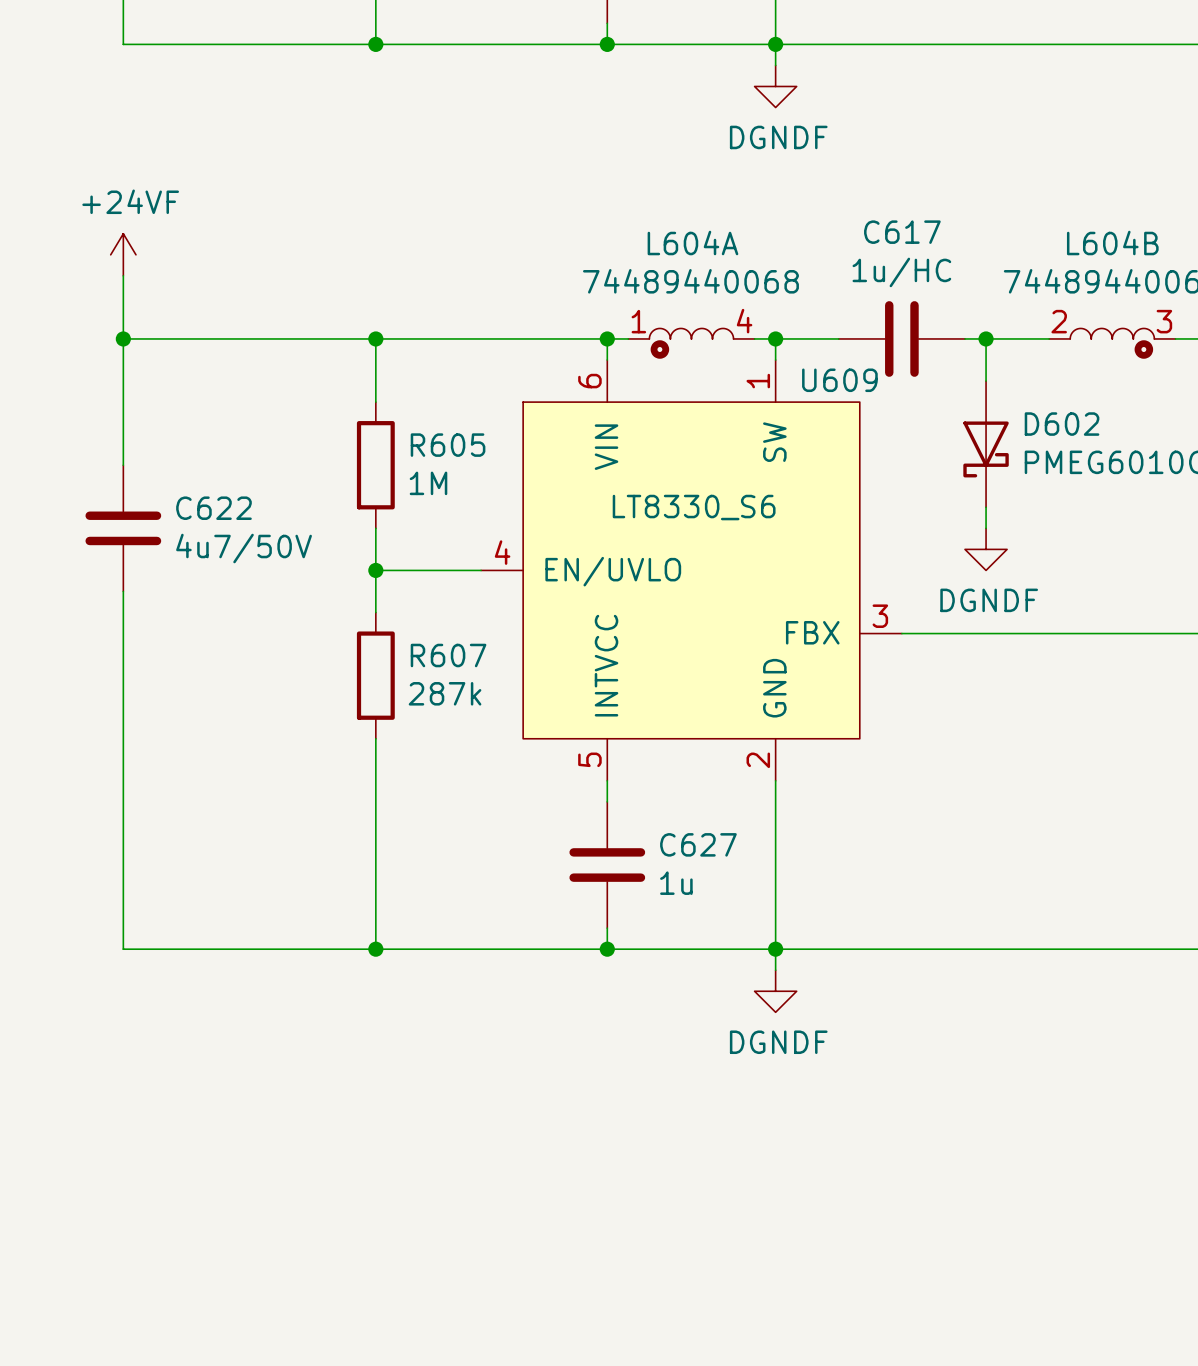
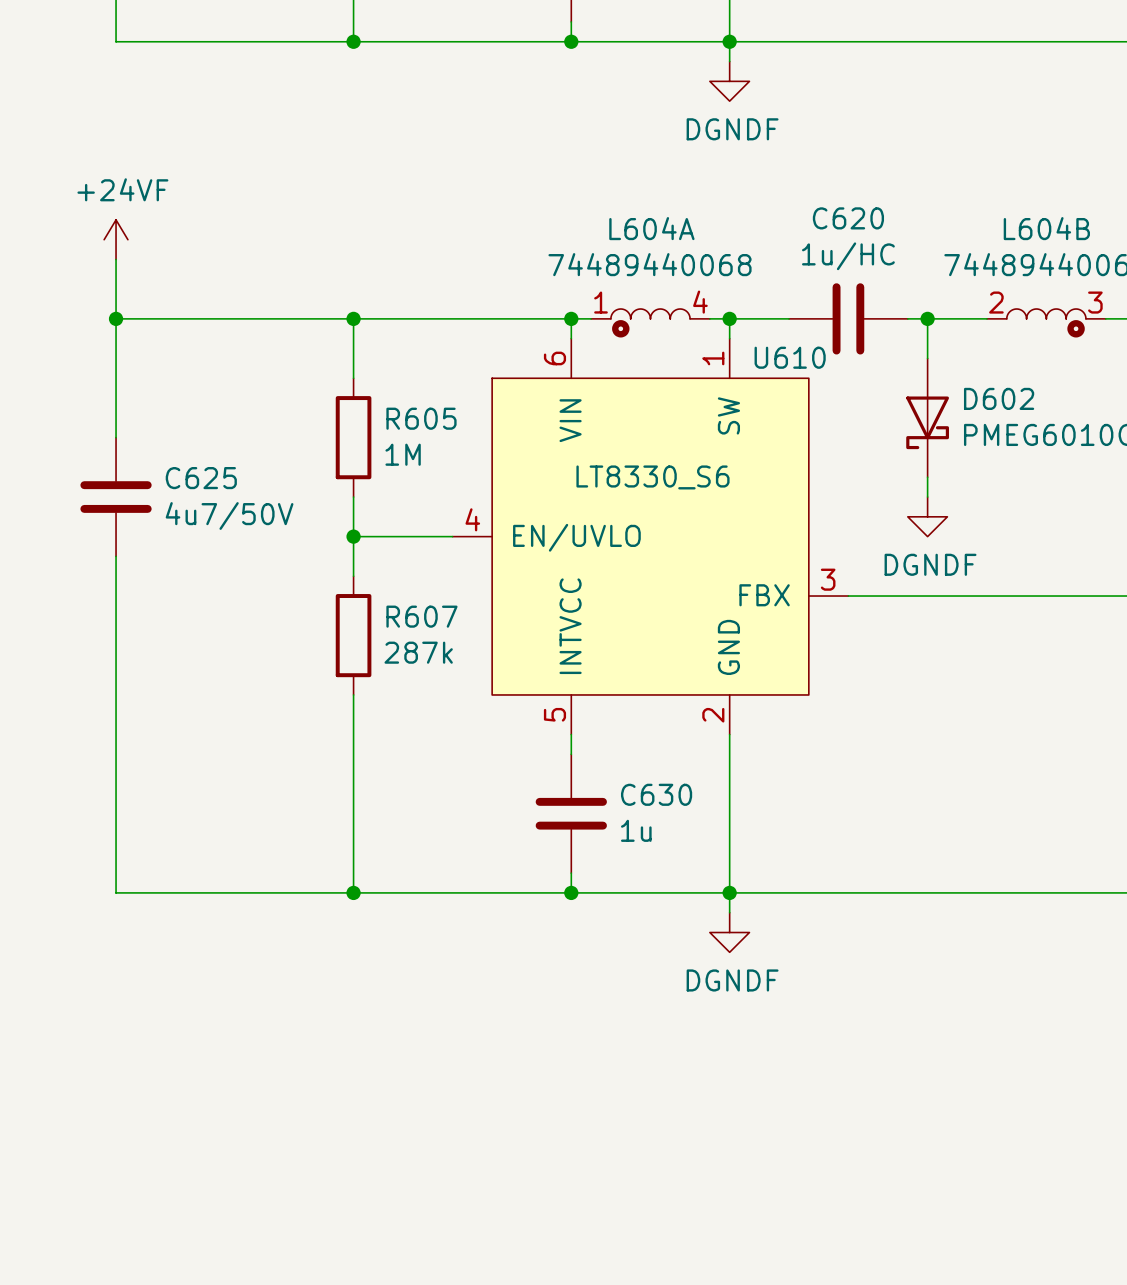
C617 name: C617 (902, 232) -> C620 (848, 218)
U609 name: U609 (839, 380) -> U610 (790, 357)
C622 name: C622 (213, 508) -> C625 (201, 478)
C627 name: C627 (698, 844) -> C630 (656, 794)

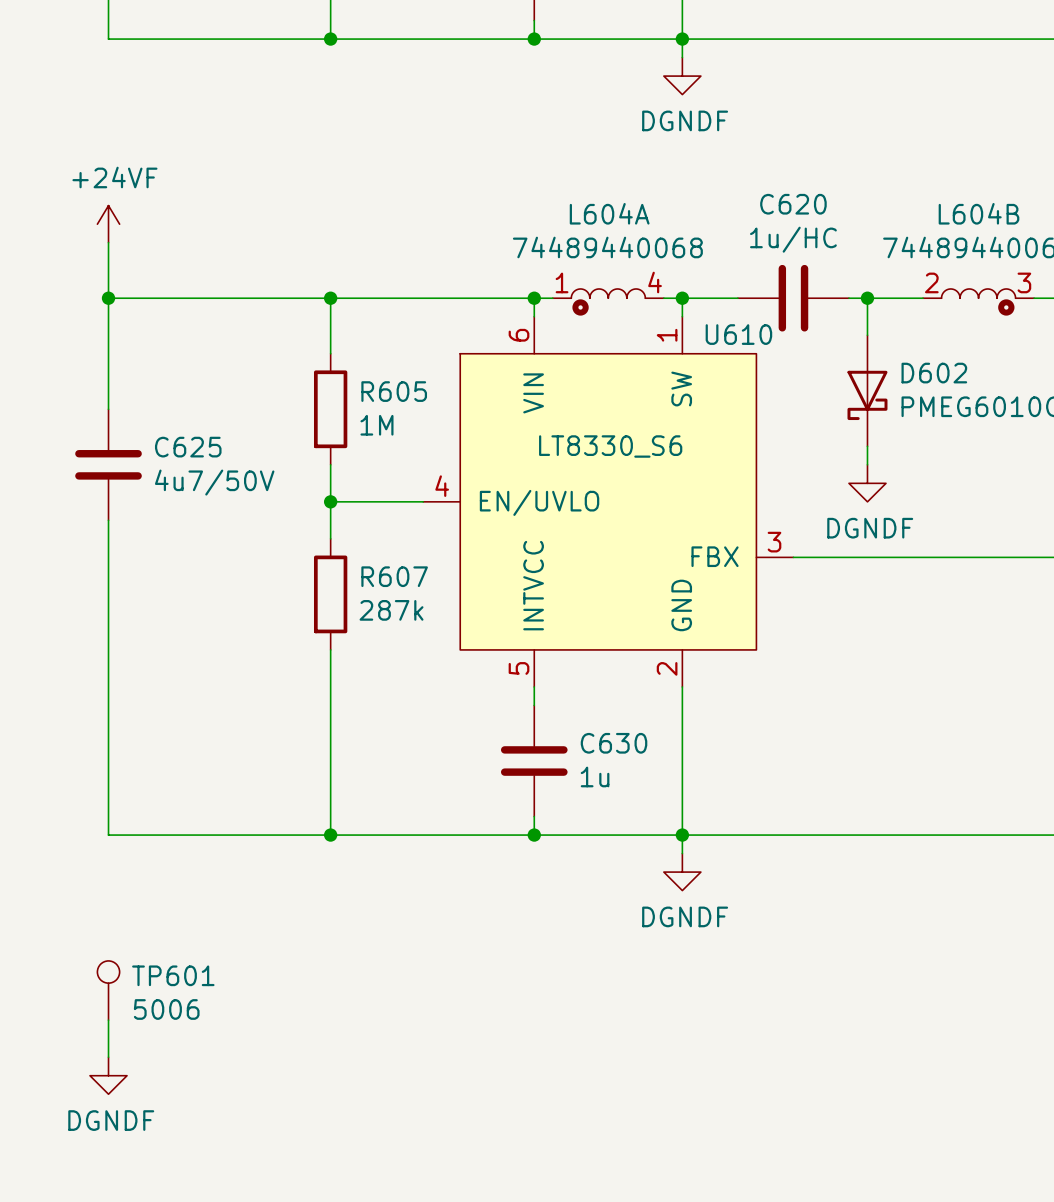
TP601: none -> 5006 (108, 990)
wire: none -> (108, 1020) (108, 1057)
power symbol: none -> DGNDF (108, 1075)

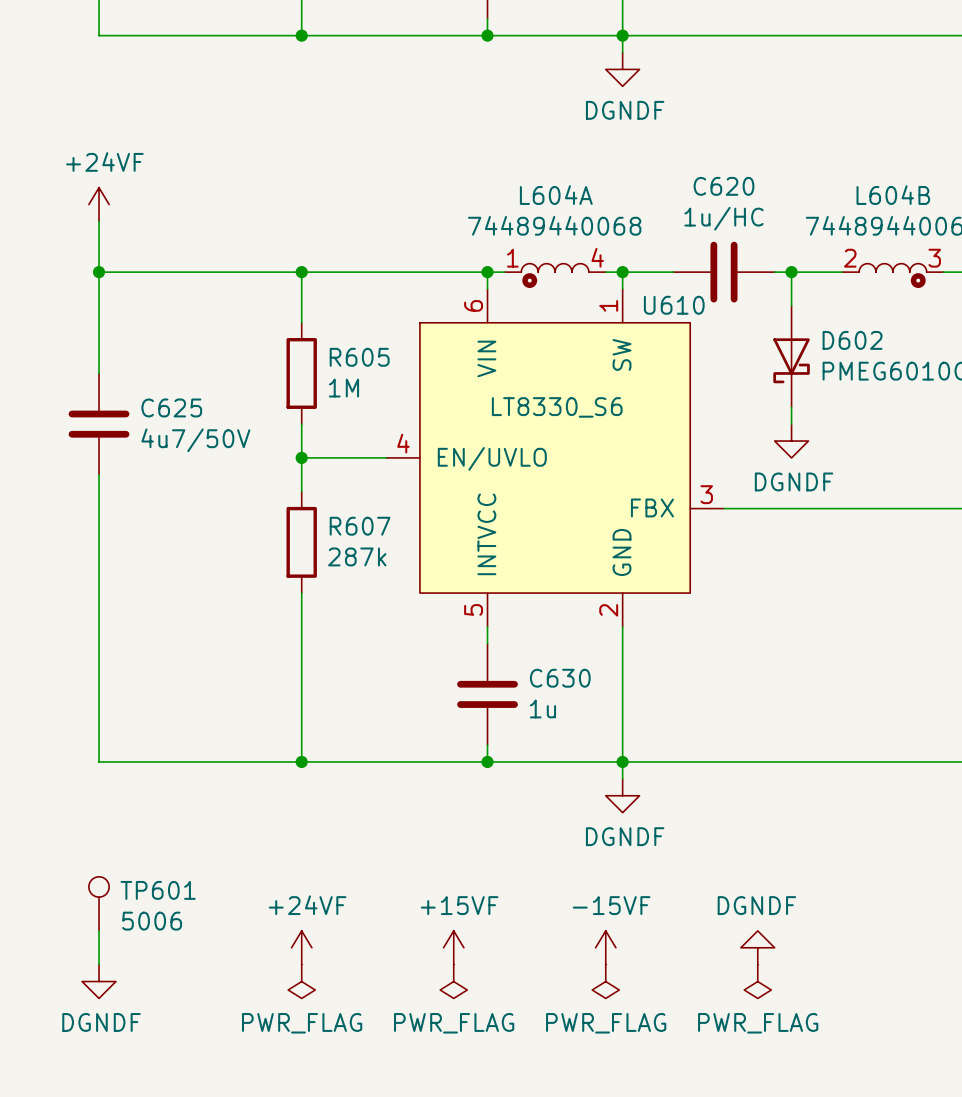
power symbol: none -> +24VF (301, 947)
power symbol: none -> +15VF (453, 947)
power symbol: none -> -15VF (605, 947)
power symbol: none -> DGNDF (757, 947)
power symbol: none -> PWR_FLAG (301, 981)
power symbol: none -> PWR_FLAG (453, 981)
power symbol: none -> PWR_FLAG (605, 981)
power symbol: none -> PWR_FLAG (757, 981)

